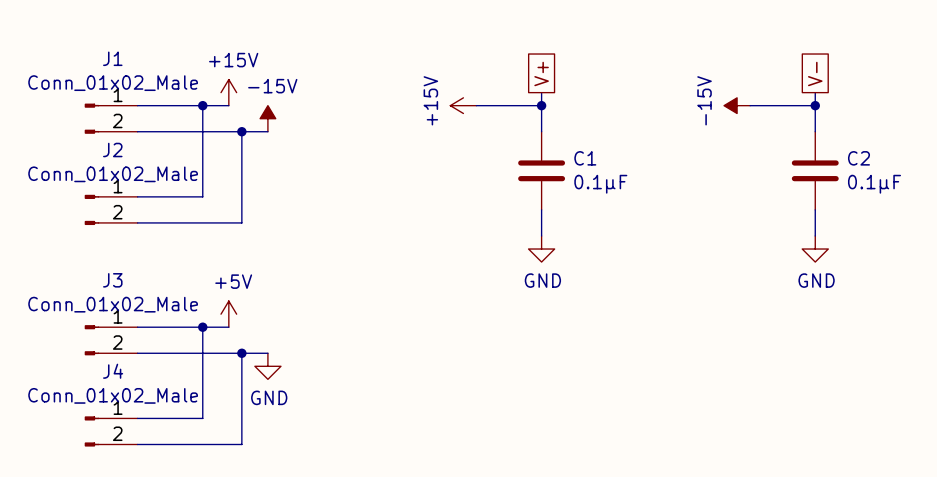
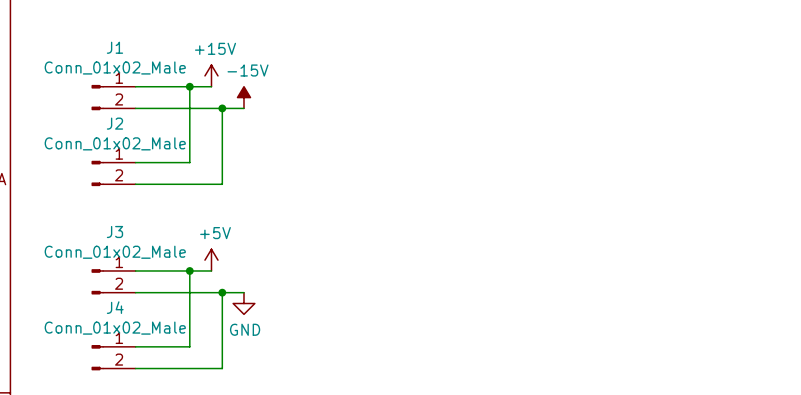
global label: V+ (541, 73) -> none
global label: V- (815, 73) -> none
wire: (541, 92) (541, 131) -> none
wire: (815, 92) (815, 131) -> none
power symbol: +15V (463, 105) -> none
wire: (476, 105) (541, 105) -> none
junction: (541, 105) -> none
power symbol: -15V (737, 105) -> none
wire: (750, 105) (815, 105) -> none
junction: (815, 105) -> none
C1: 0.1µF (541, 170) -> none
C2: 0.1µF (815, 170) -> none
wire: (541, 209) (541, 235) -> none
wire: (815, 209) (815, 235) -> none
power symbol: GND (541, 249) -> none
power symbol: GND (815, 249) -> none

